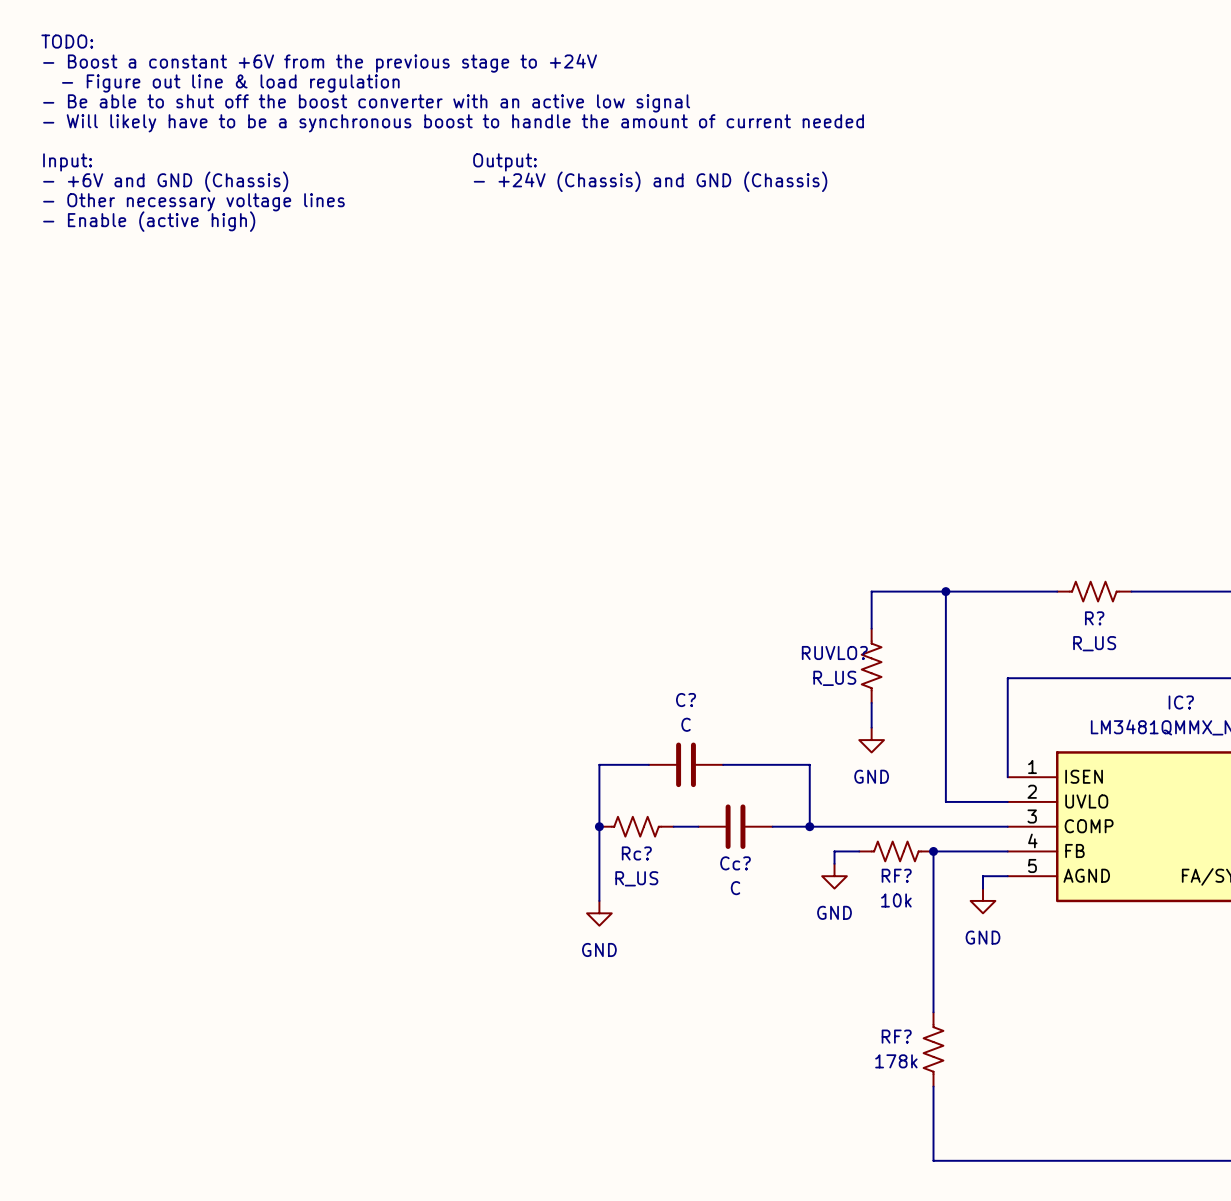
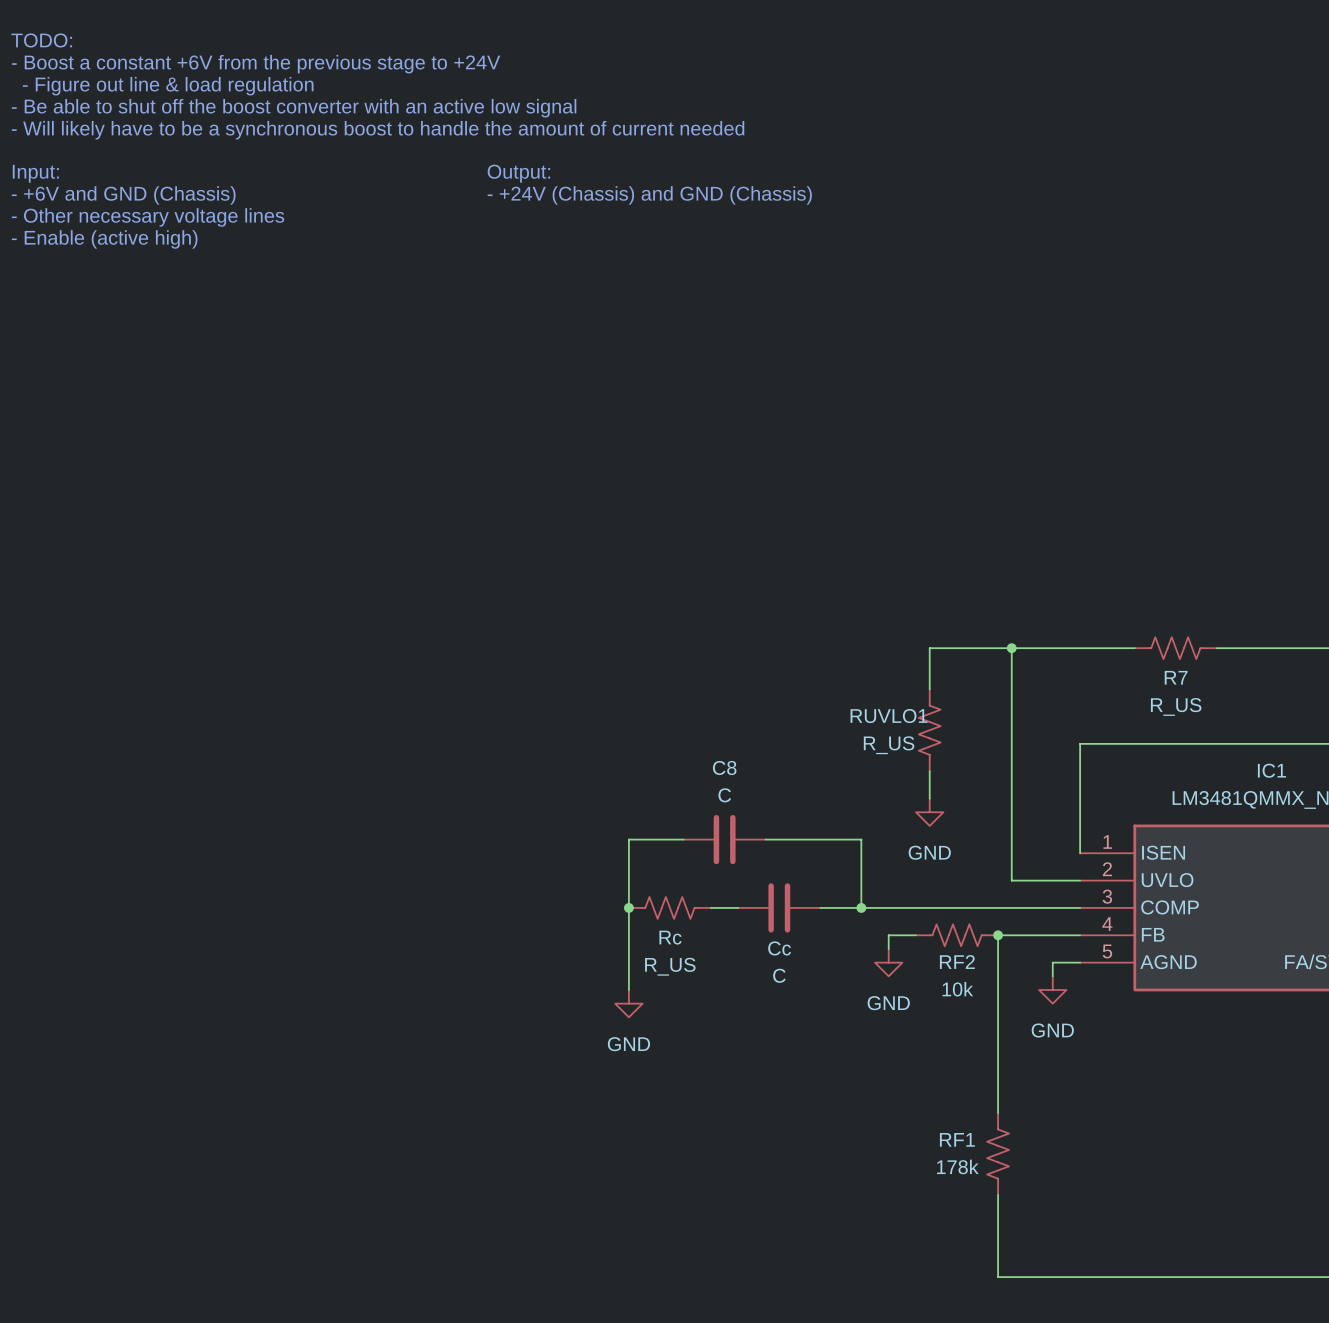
R? name: R? (1094, 618) -> R7 (1176, 677)
RUVLO? name: RUVLO? (834, 653) -> RUVLO1 (889, 716)
C? name: C? (686, 700) -> C8 (724, 767)
IC? name: IC? (1181, 702) -> IC1 (1271, 770)
Rc? name: Rc? (636, 853) -> Rc (670, 937)
Cc? name: Cc? (735, 863) -> Cc (779, 948)
RF? name: RF? (896, 875) -> RF2 (957, 962)
RF? name: RF? (896, 1036) -> RF1 (957, 1139)

